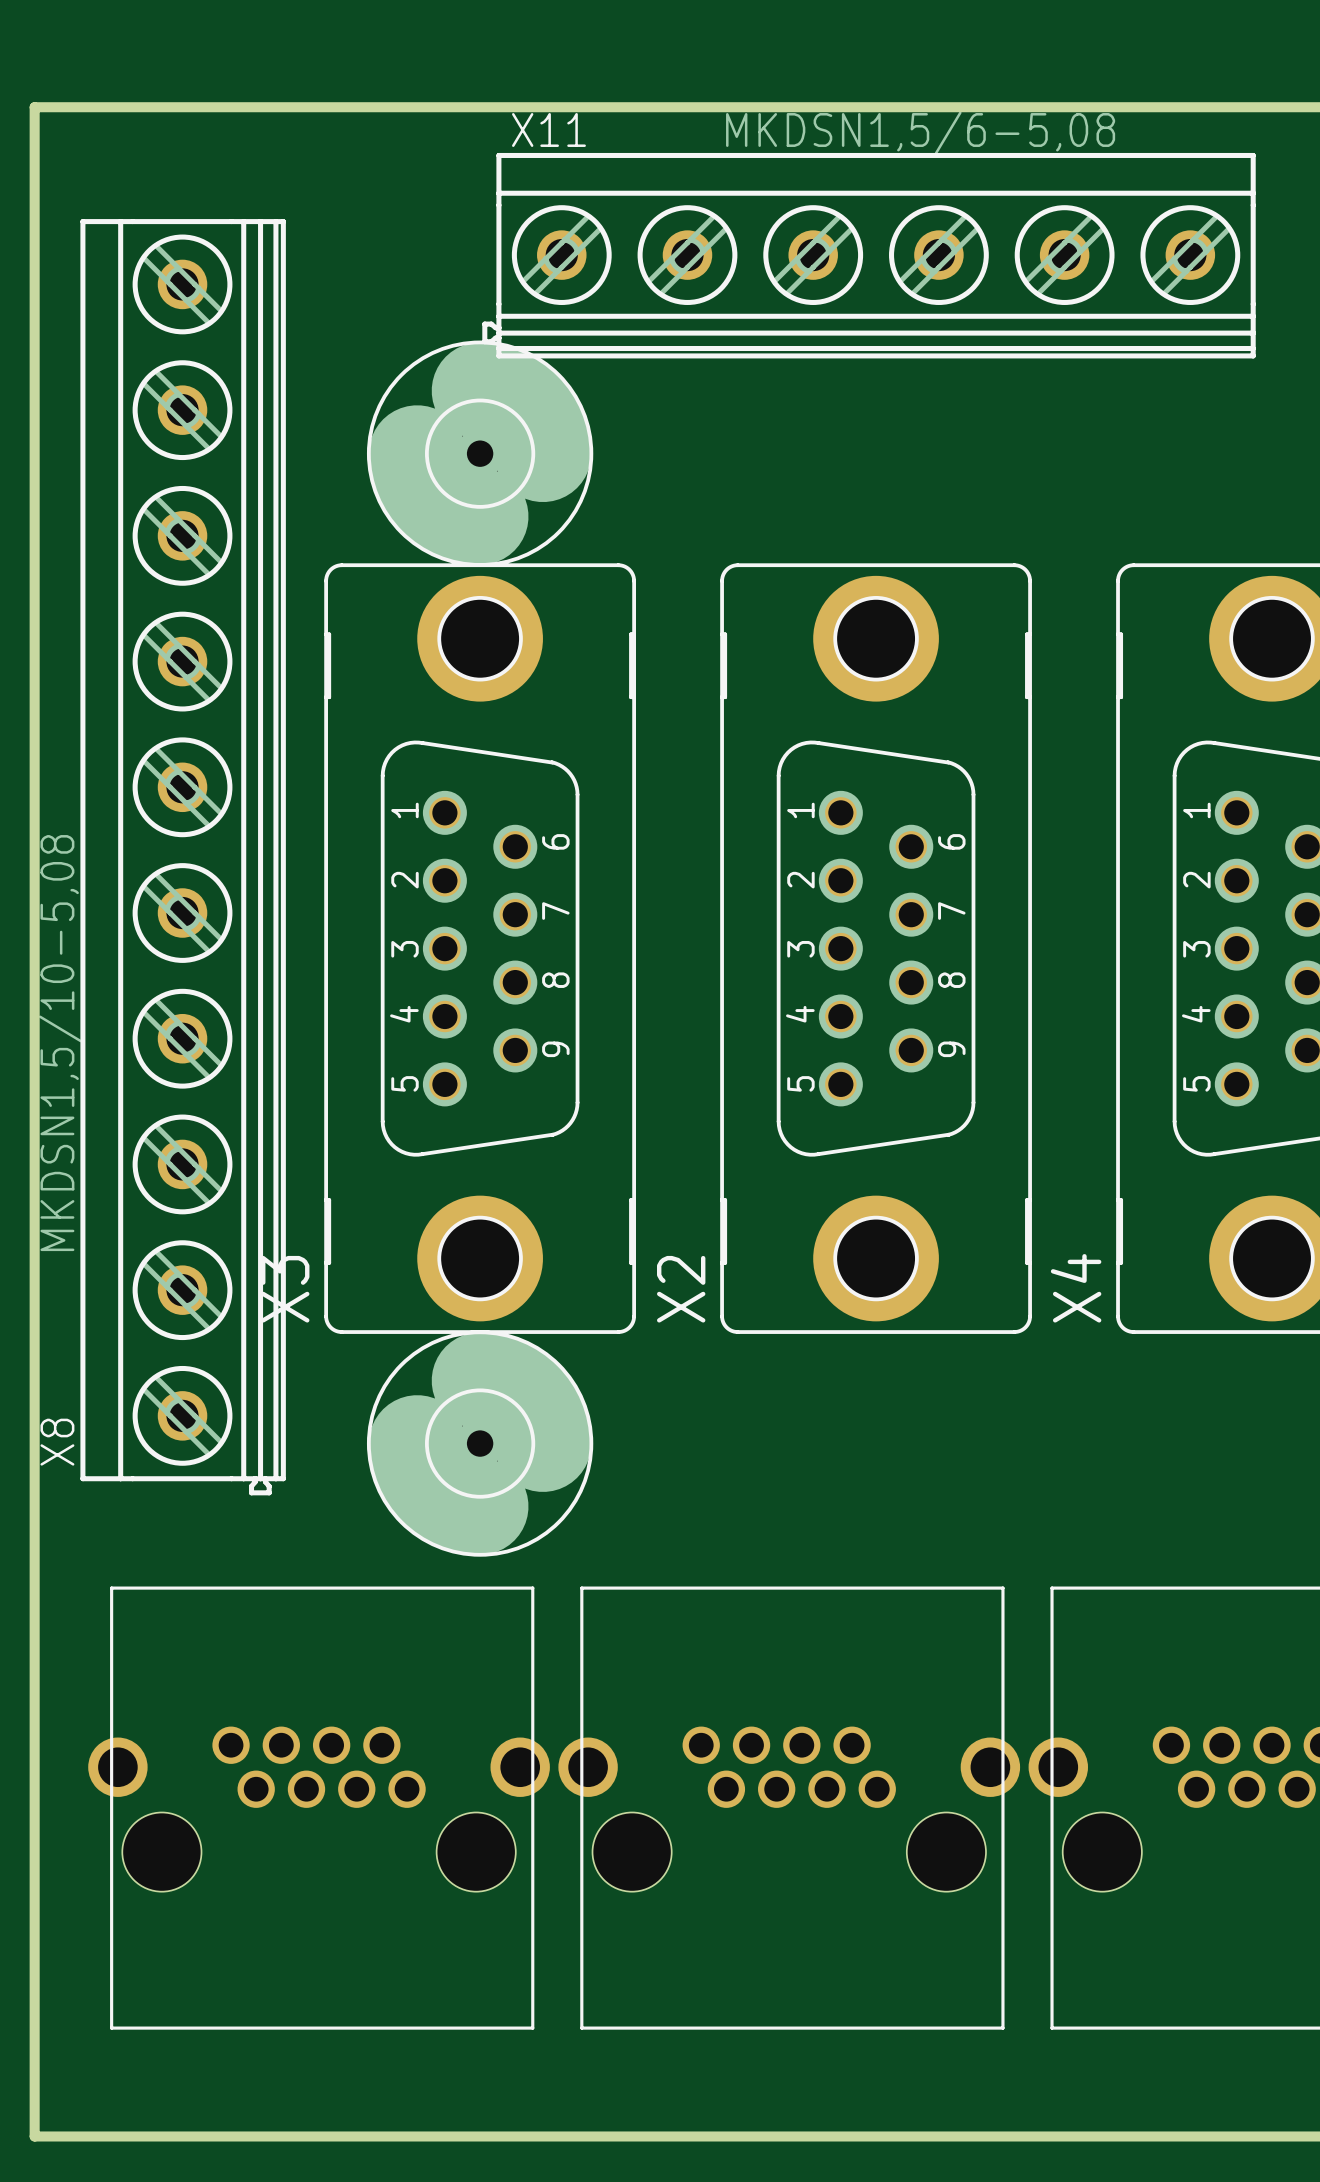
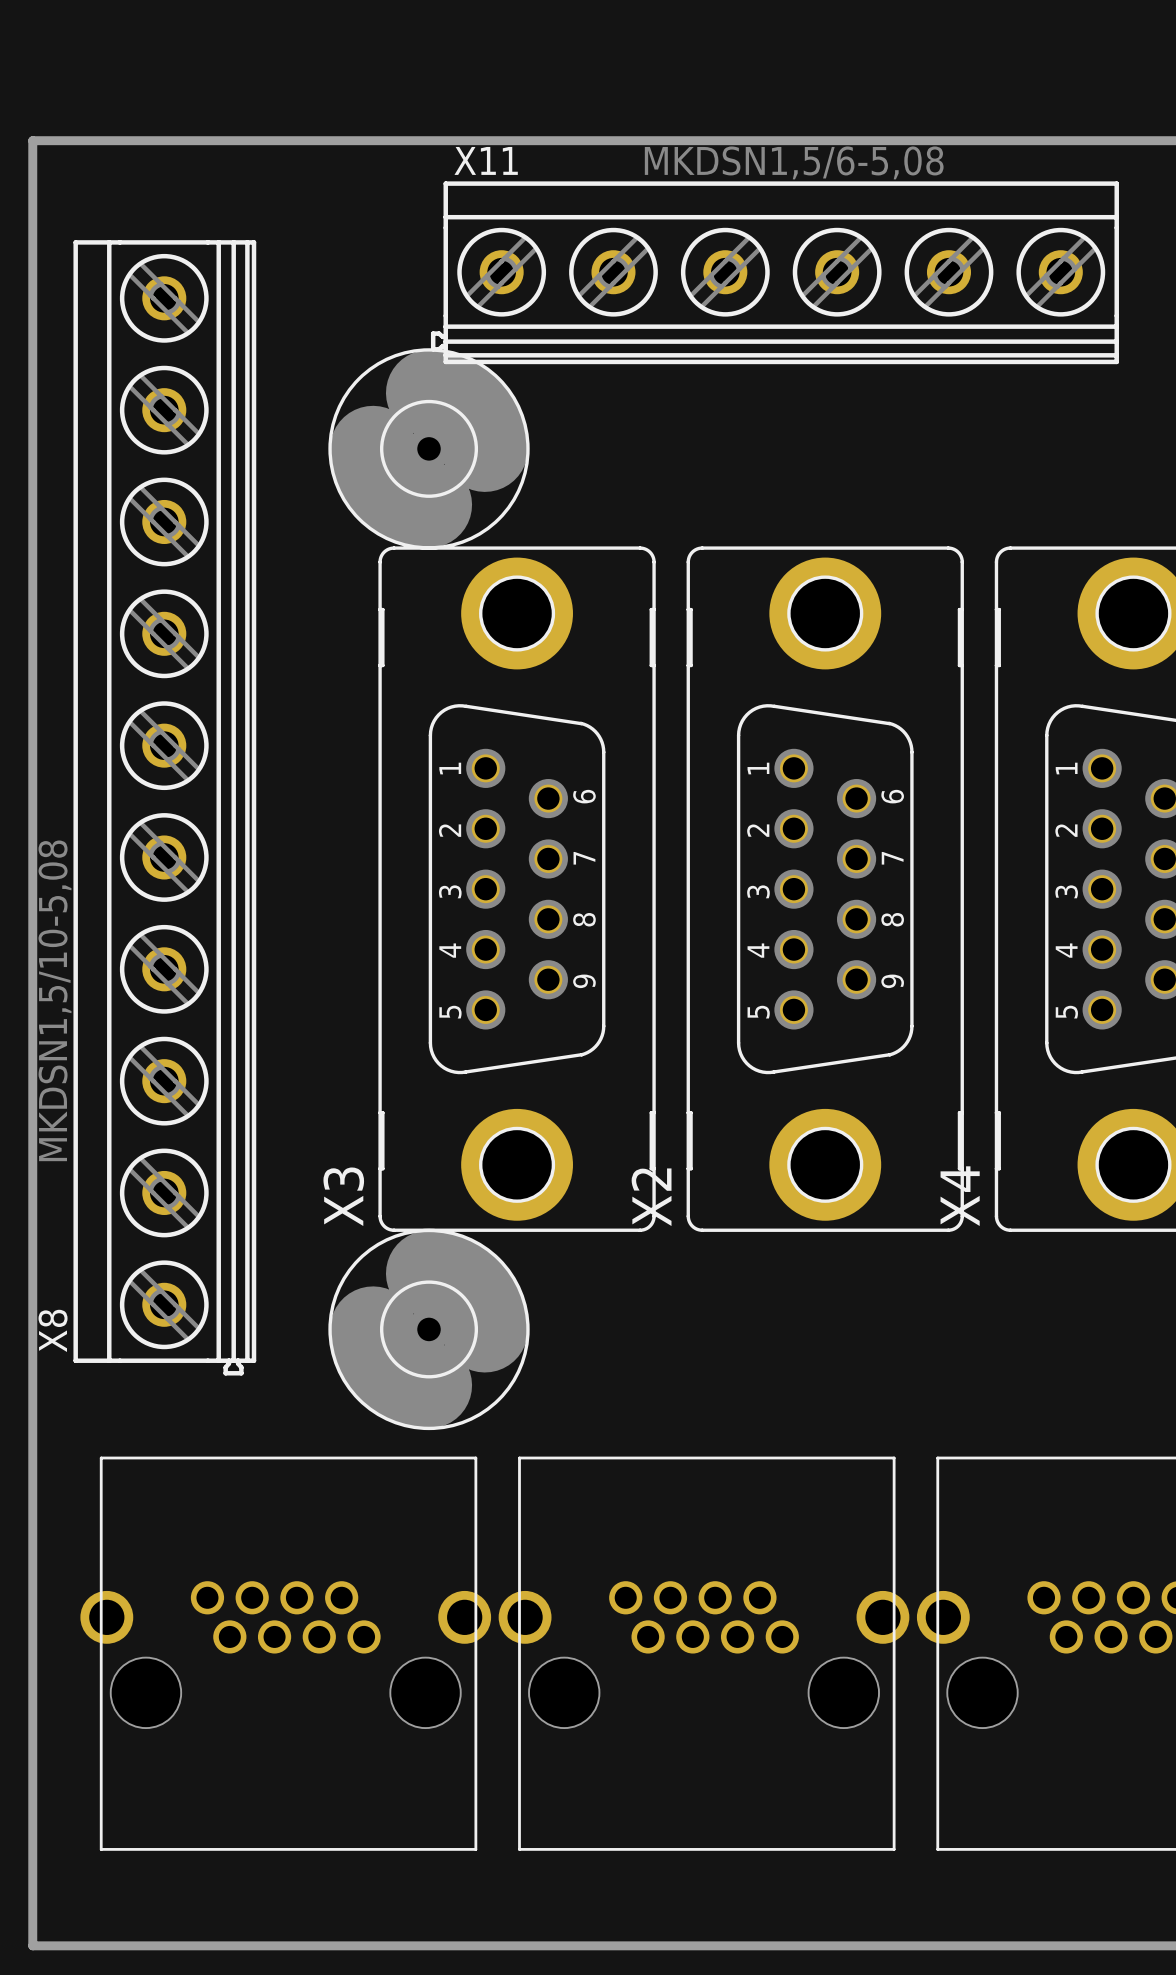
X3 position: (480, 948) -> (517, 889)
X2 position: (876, 948) -> (825, 889)

